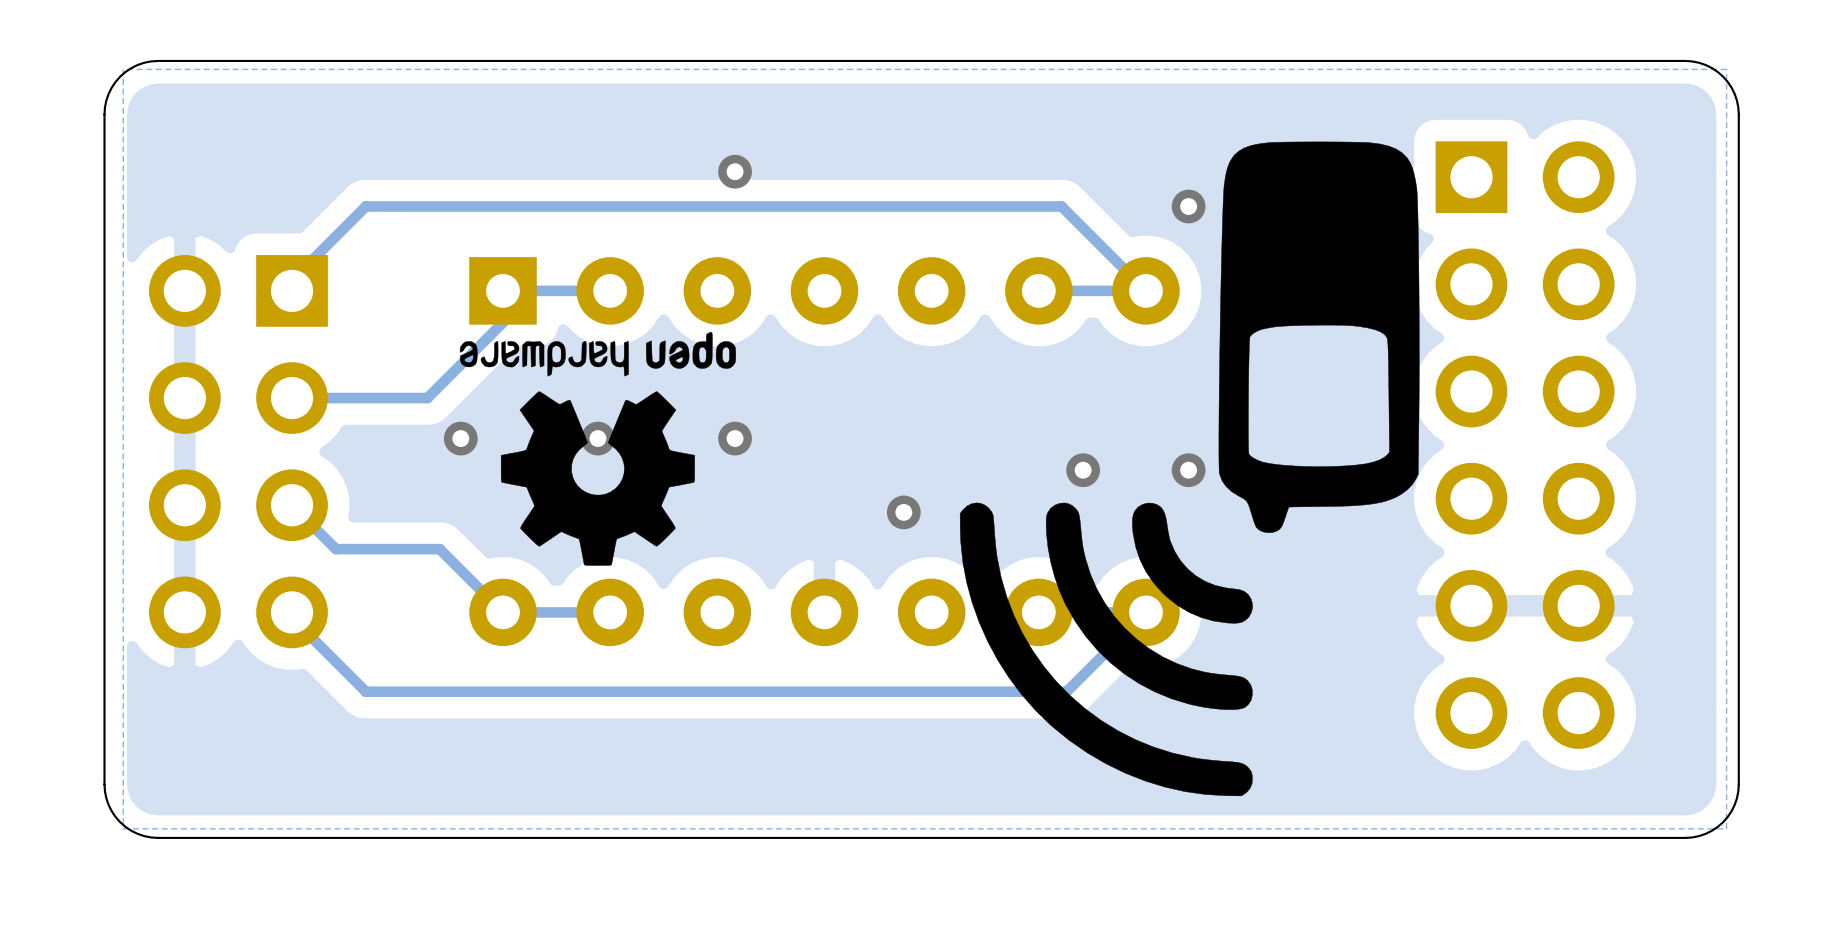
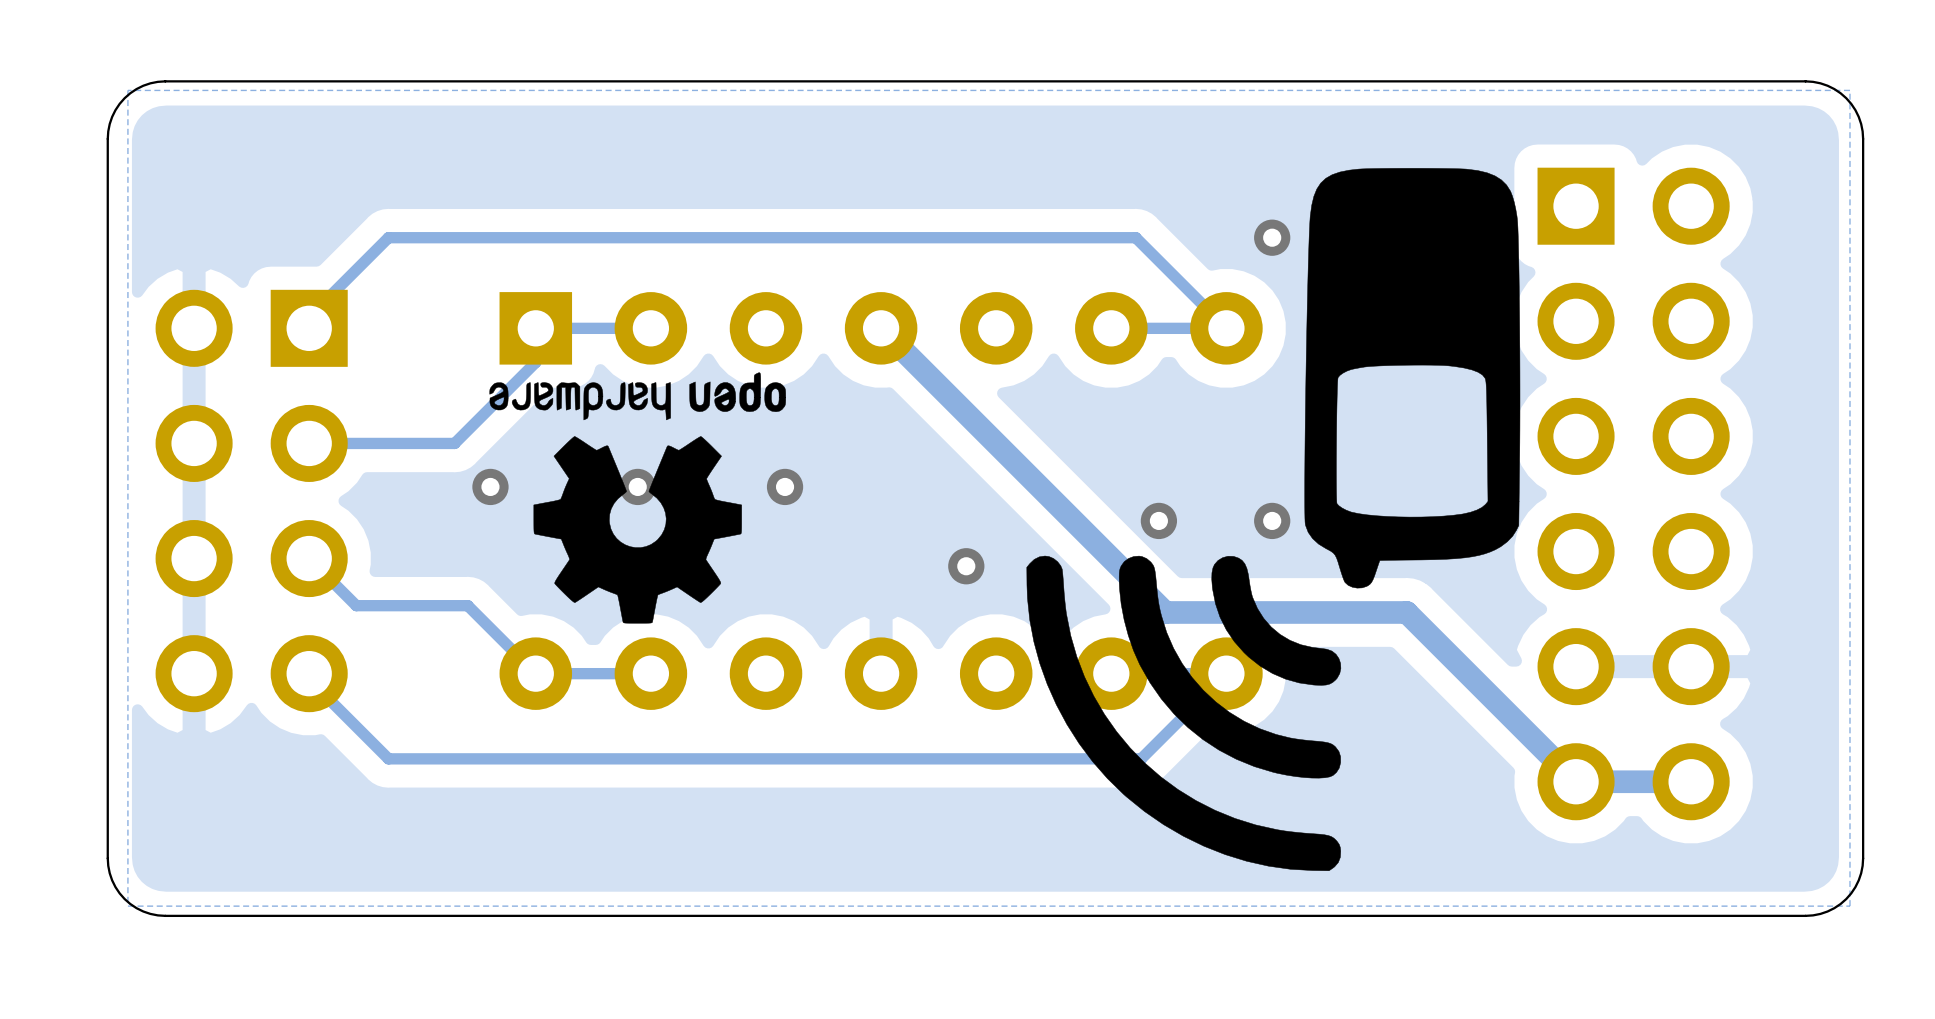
via: (735, 171) -> none
track: none -> (881, 328) (1165, 612) (1406, 612) (1576, 781) (1691, 781)

